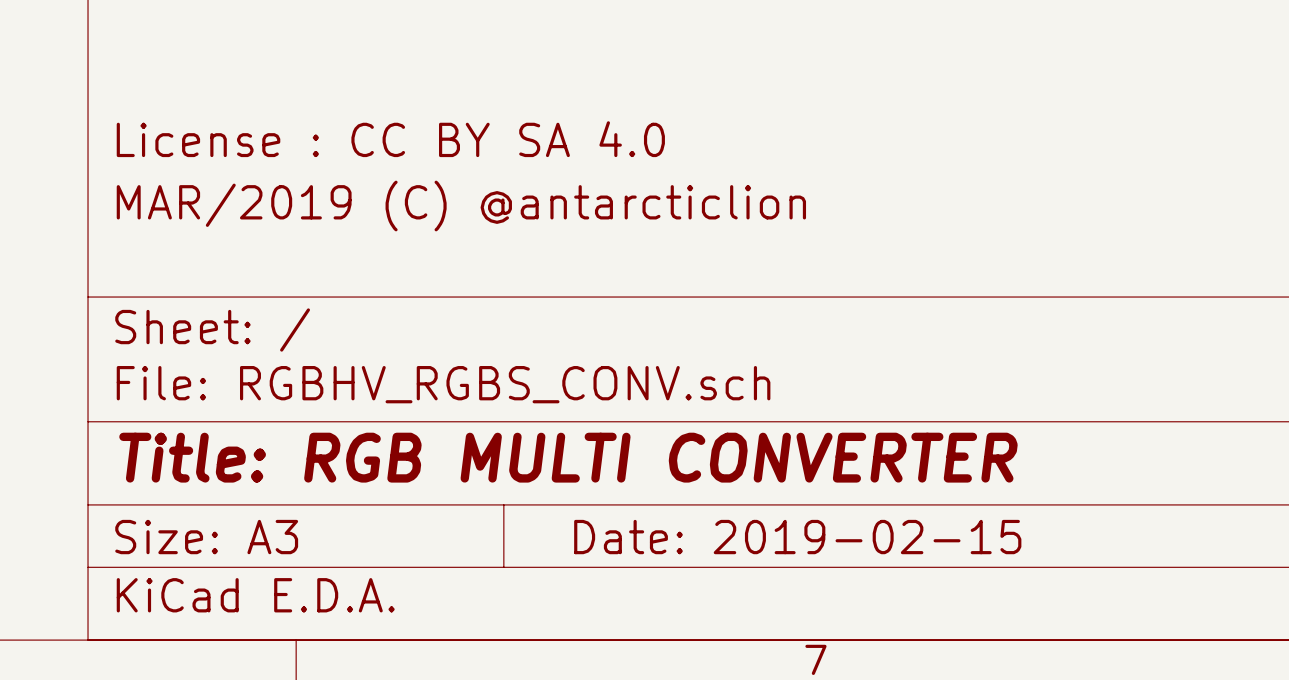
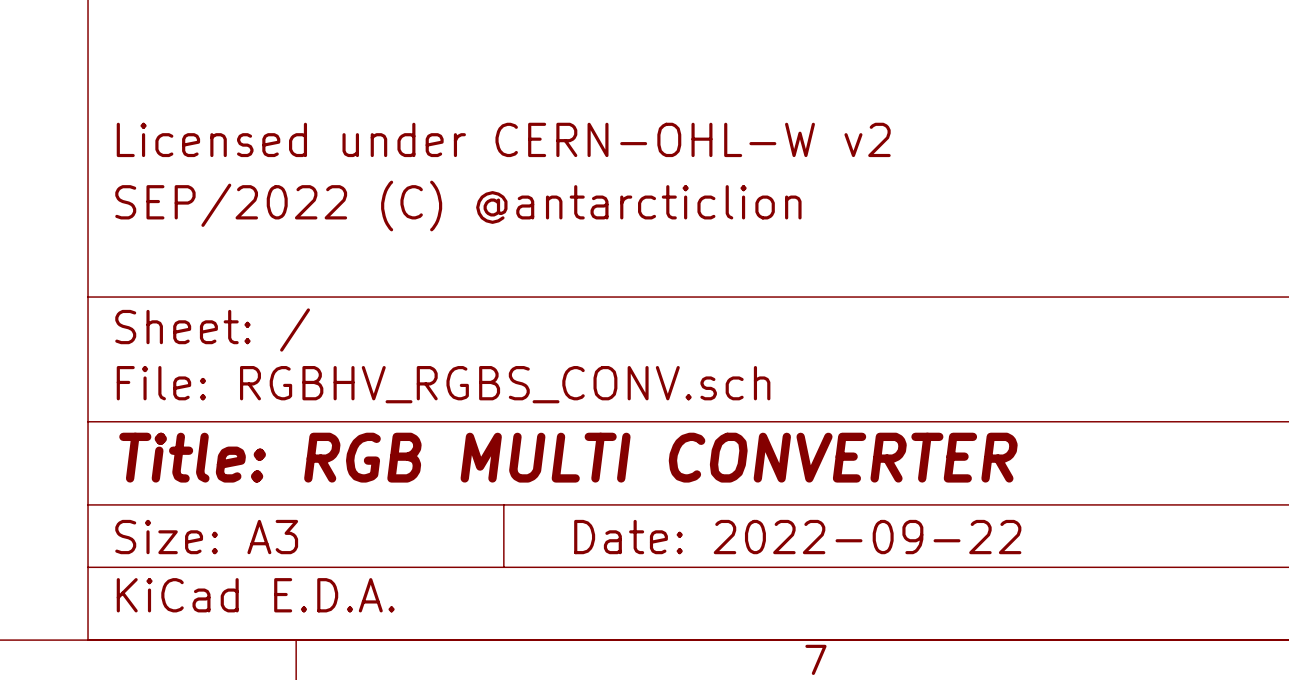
title block: License : CC BY SA 4.0 (390, 139) -> Licensed under CERN-OHL-W v2 (503, 139)
title block: MAR/2019 (C) @antarcticlion (461, 206) -> SEP/2022 (C) @antarcticlion (458, 206)
title block: Date: 2019-02-15 (797, 537) -> Date: 2022-09-22 (797, 537)

